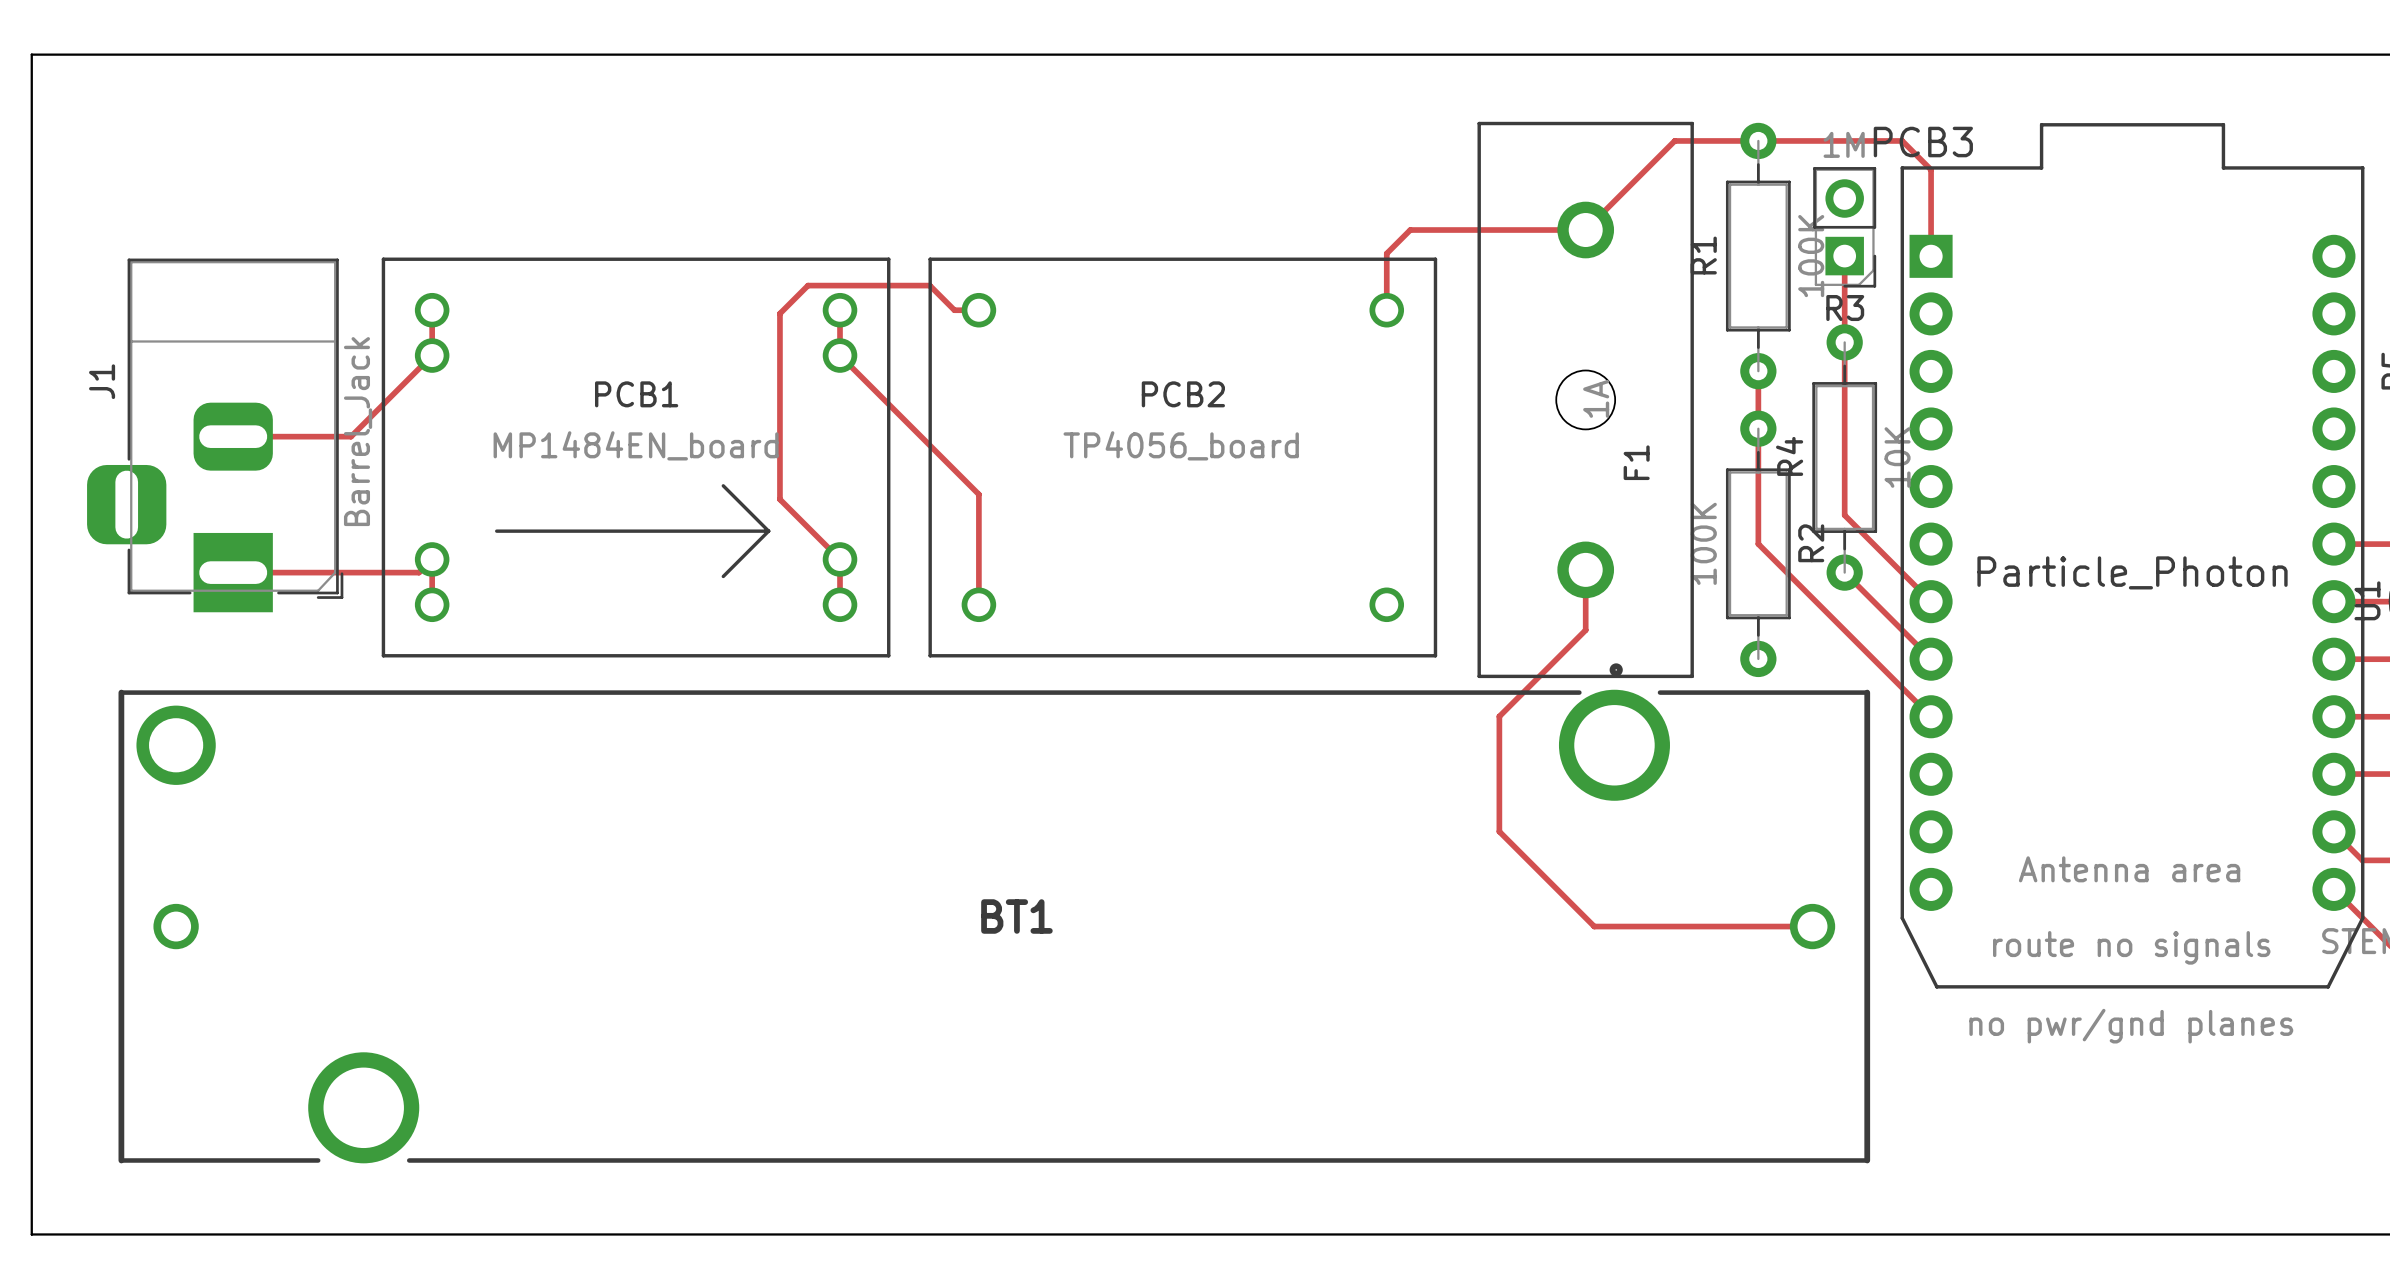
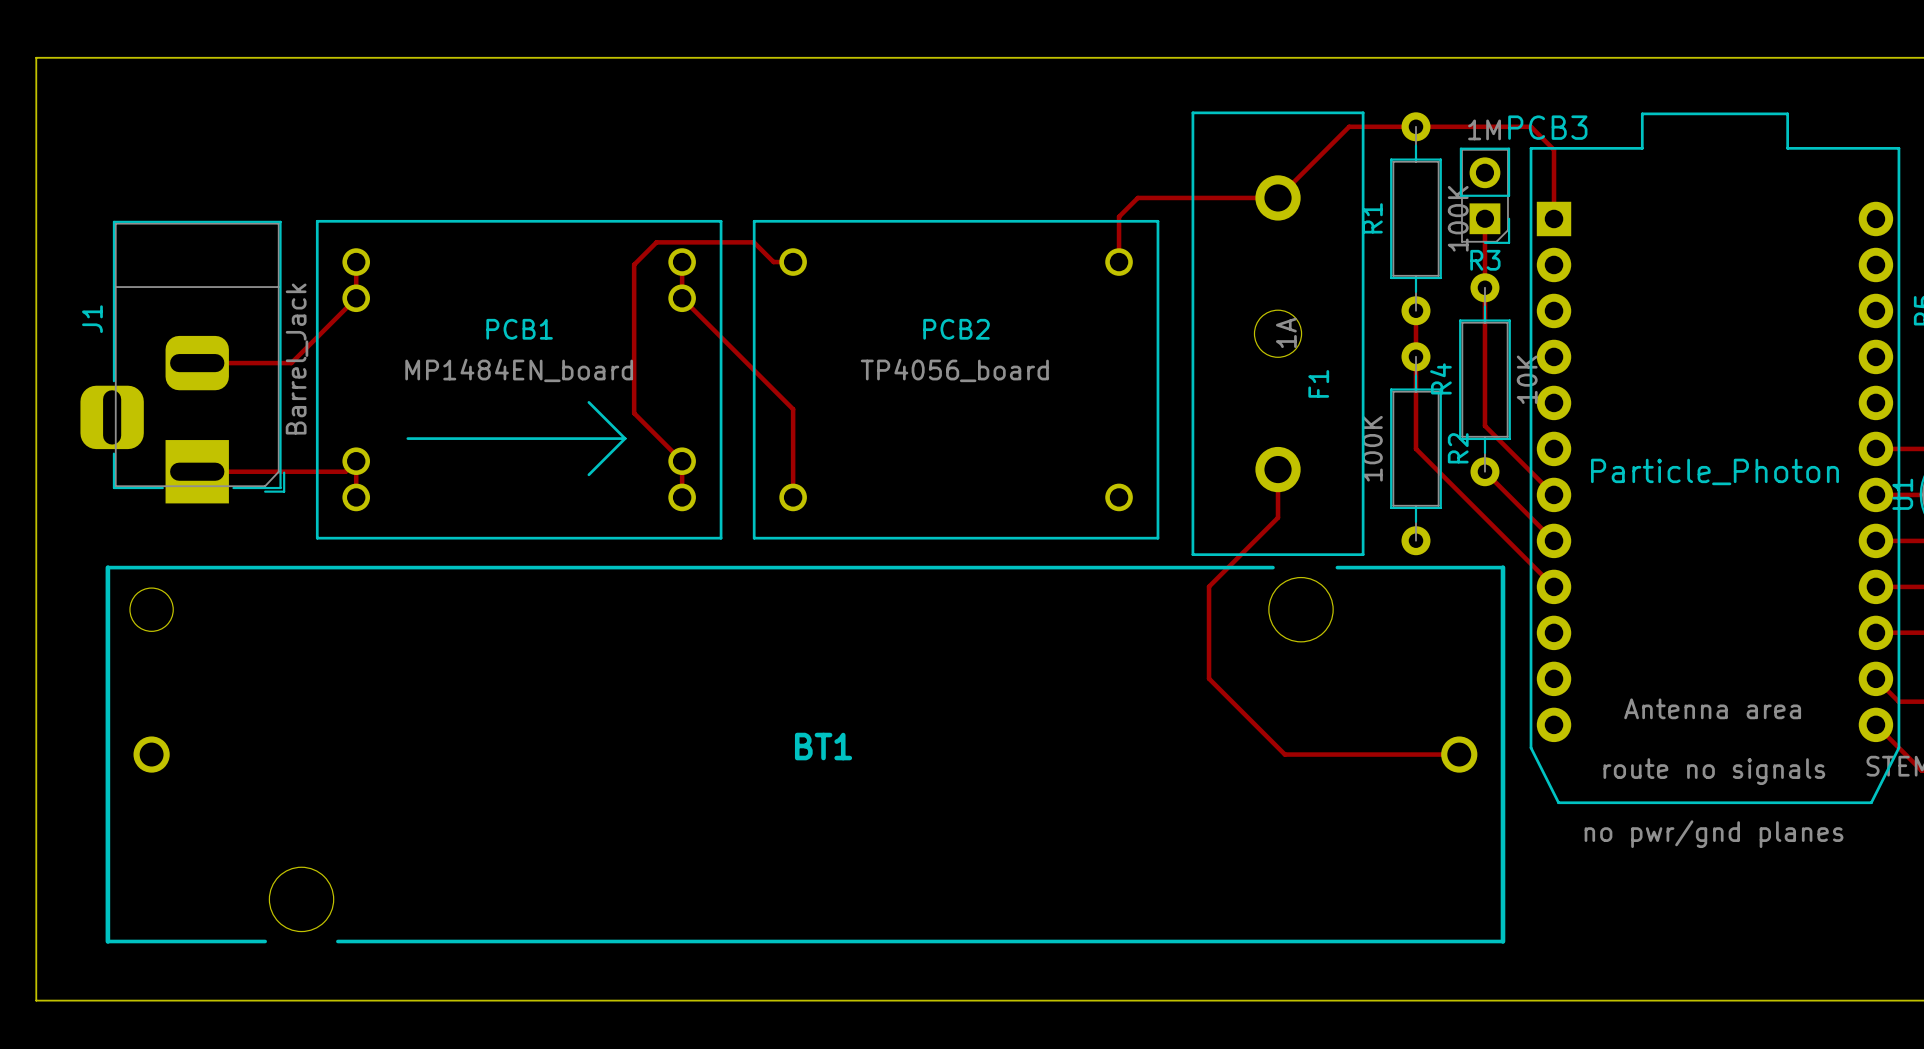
BT1 footprint: [118, 663, 1871, 1164] -> [105, 565, 1506, 944]

